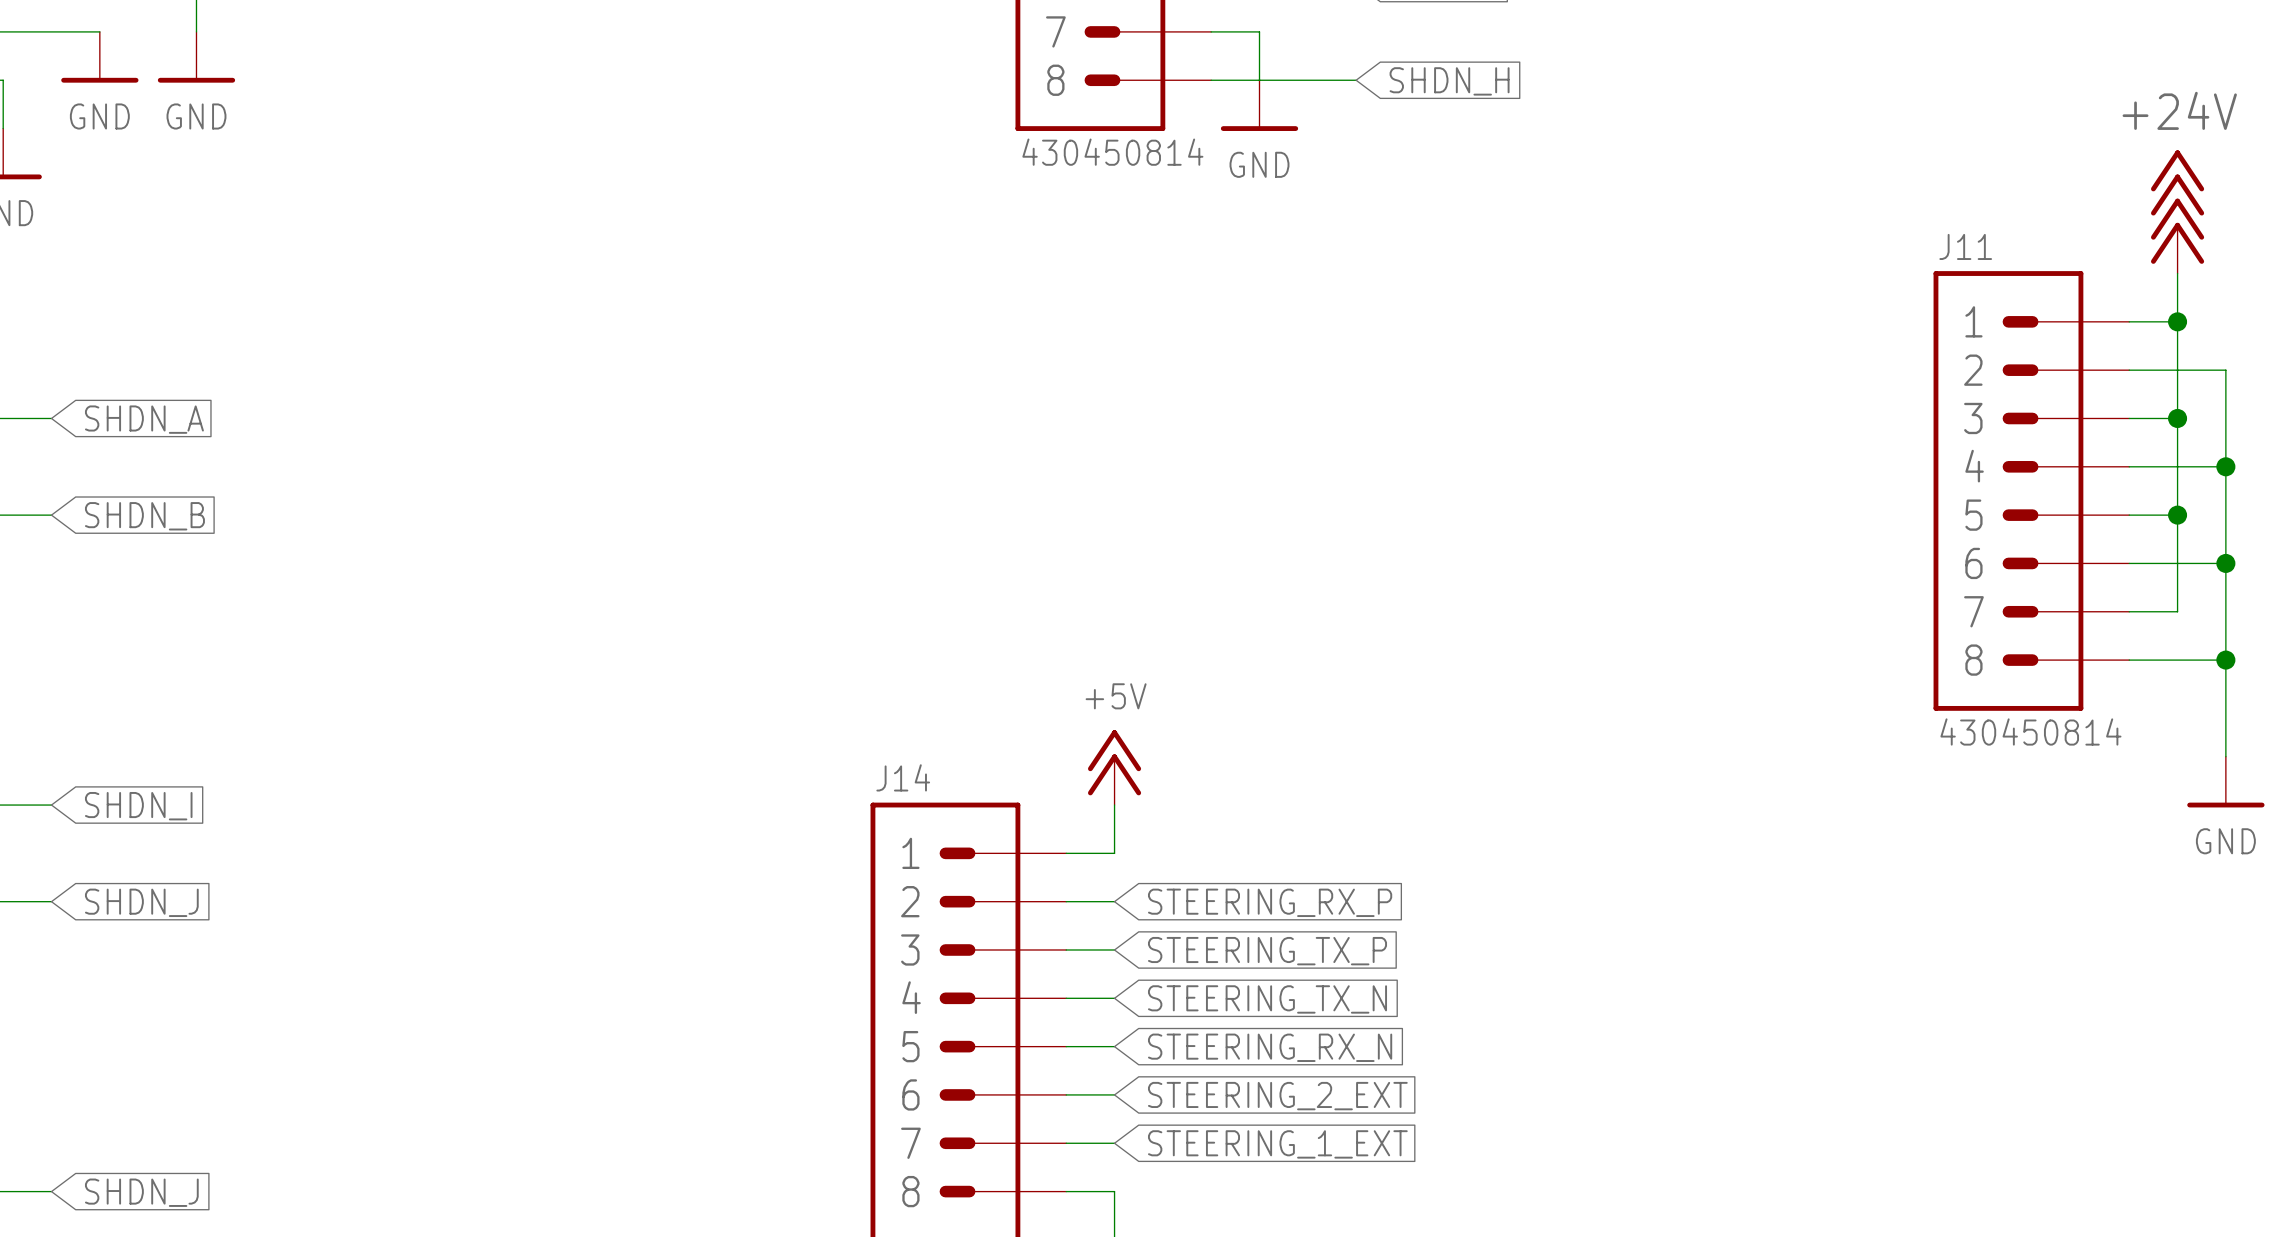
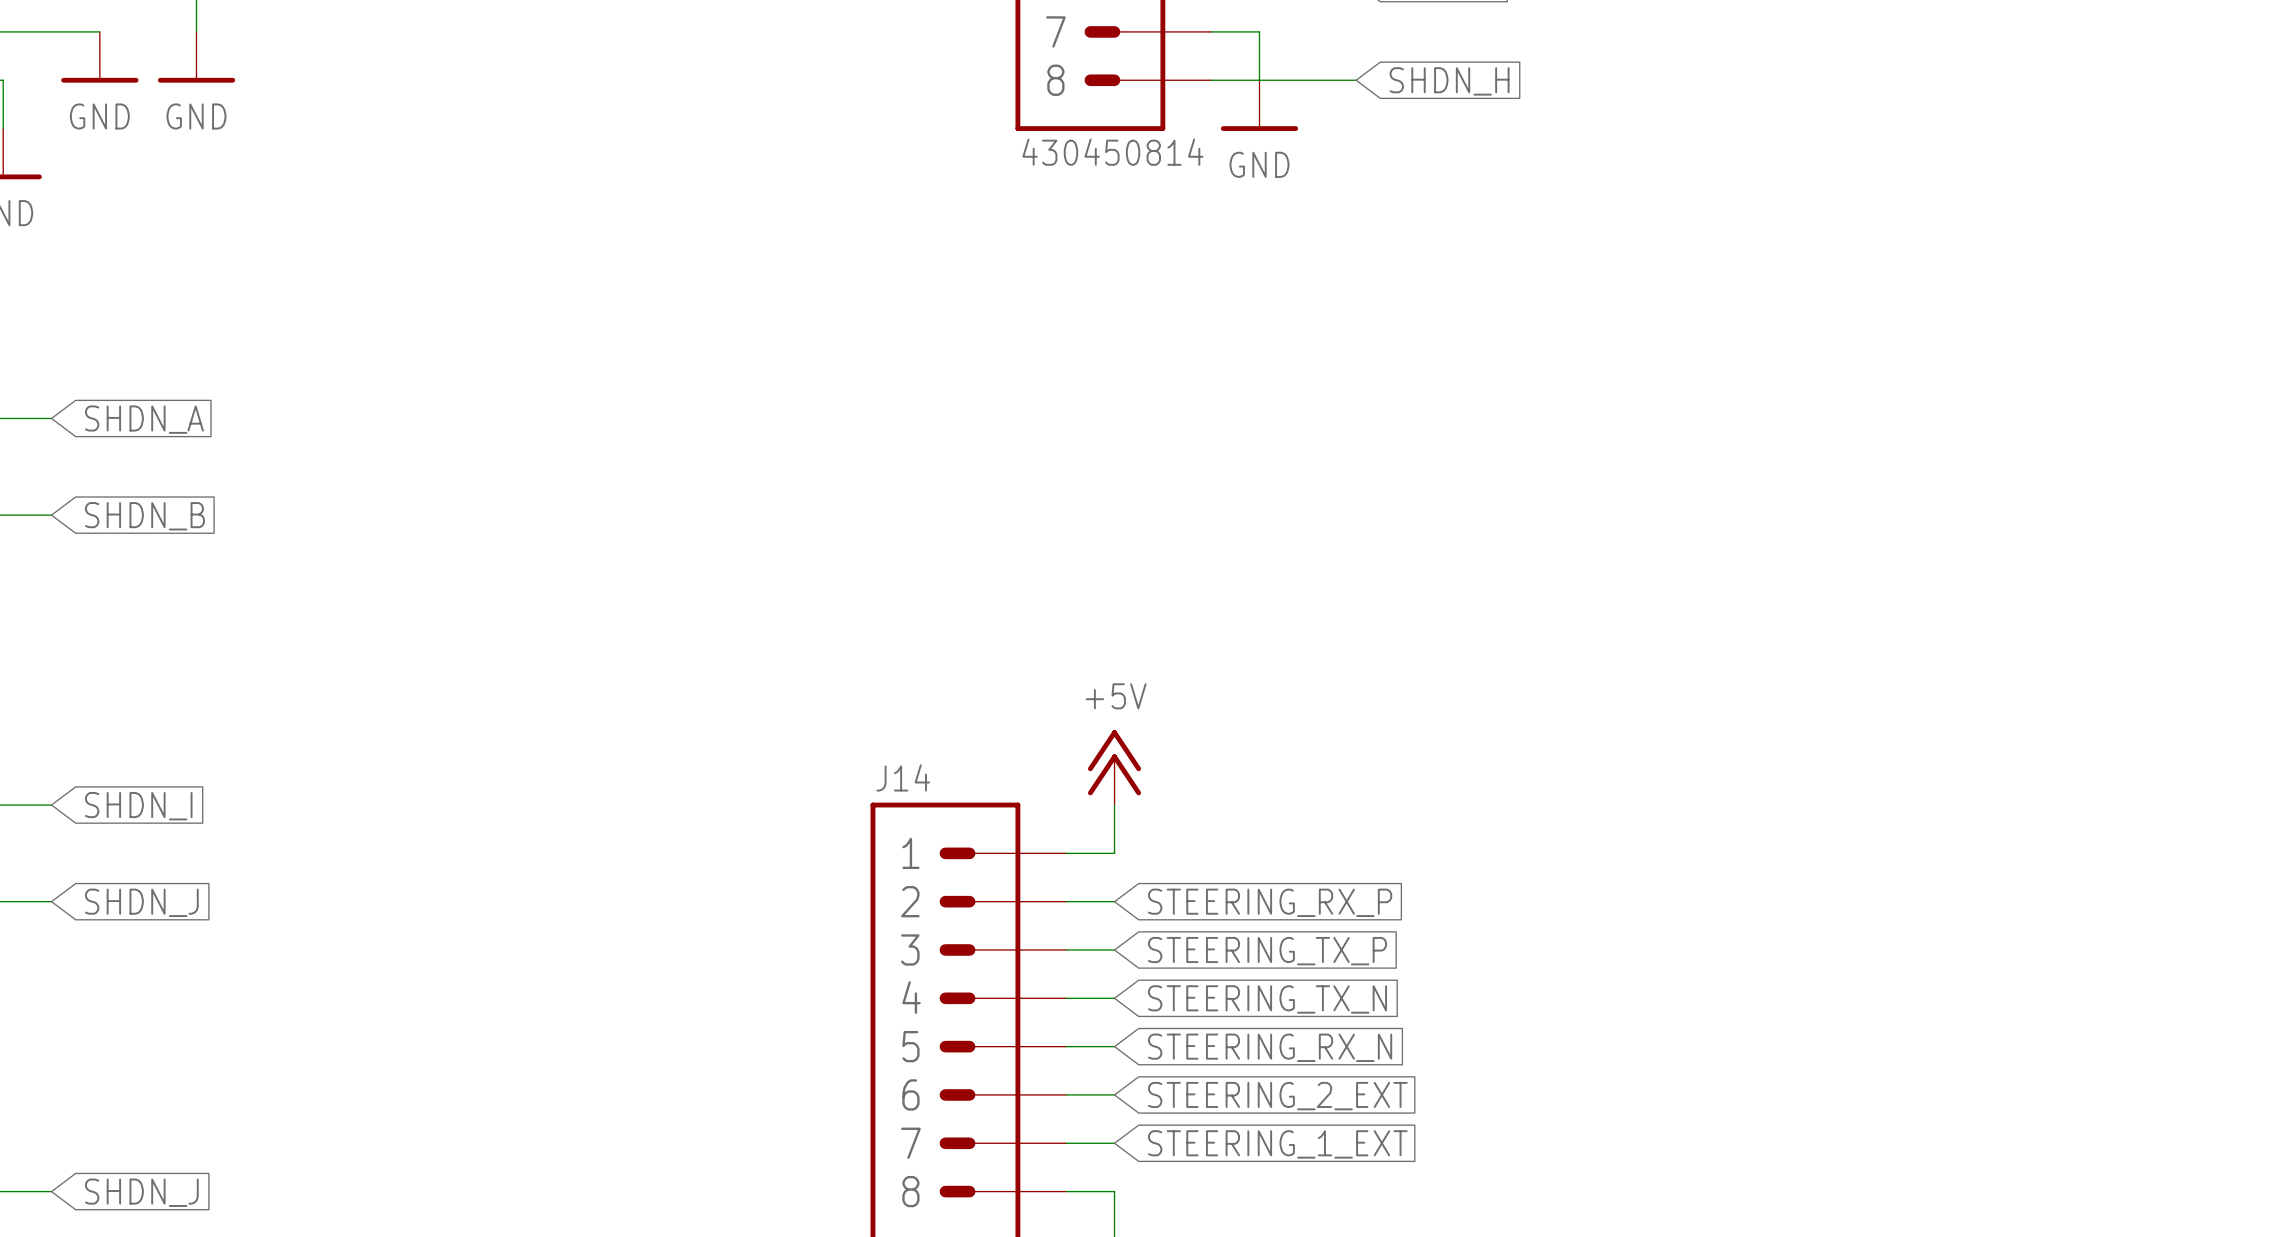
power symbol: +24V (2177, 211) -> none
wire: (2177, 273) (2177, 611) (2129, 611) -> none
wire: (2129, 321) (2177, 321) -> none
junction: (2177, 321) -> none
wire: (2129, 370) (2225, 370) (2225, 756) -> none
wire: (2129, 418) (2177, 418) -> none
junction: (2177, 418) -> none
wire: (2129, 466) (2225, 466) -> none
junction: (2225, 466) -> none
J11: (2031, 490) -> none
wire: (2129, 515) (2177, 515) -> none
junction: (2177, 515) -> none
wire: (2129, 563) (2225, 563) -> none
junction: (2225, 563) -> none
wire: (2129, 660) (2225, 660) -> none
junction: (2225, 660) -> none
power symbol: GND (2225, 782) -> none

